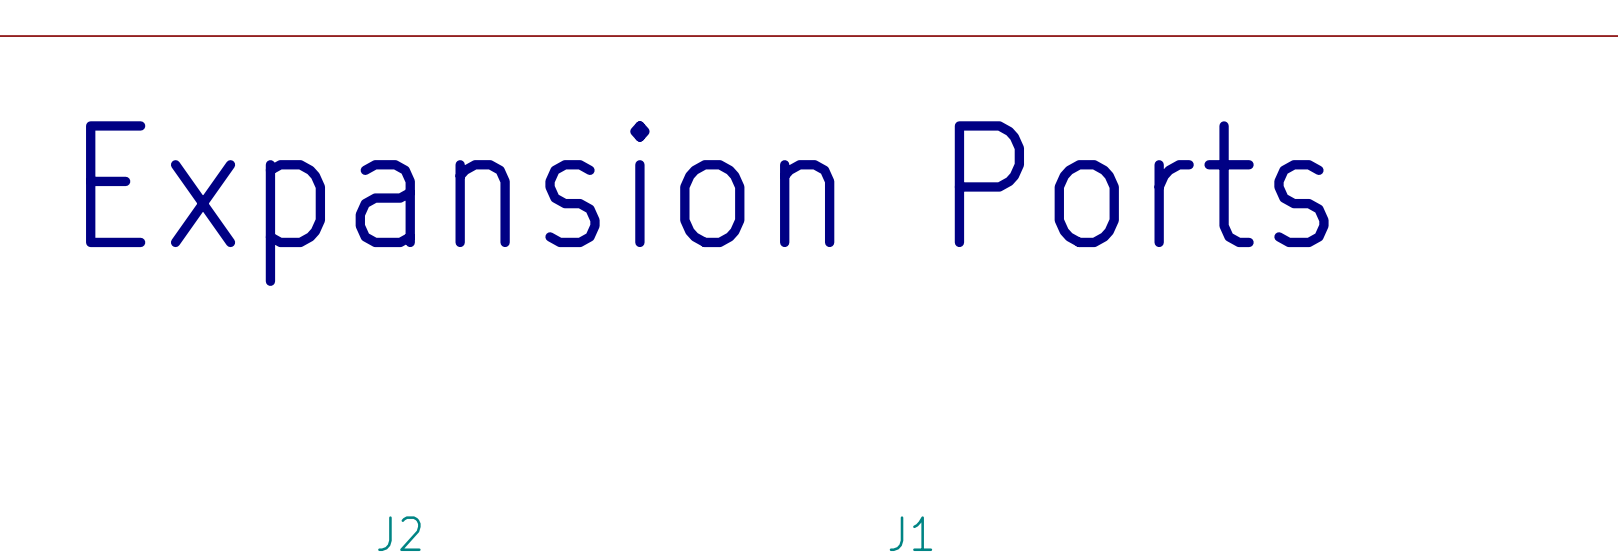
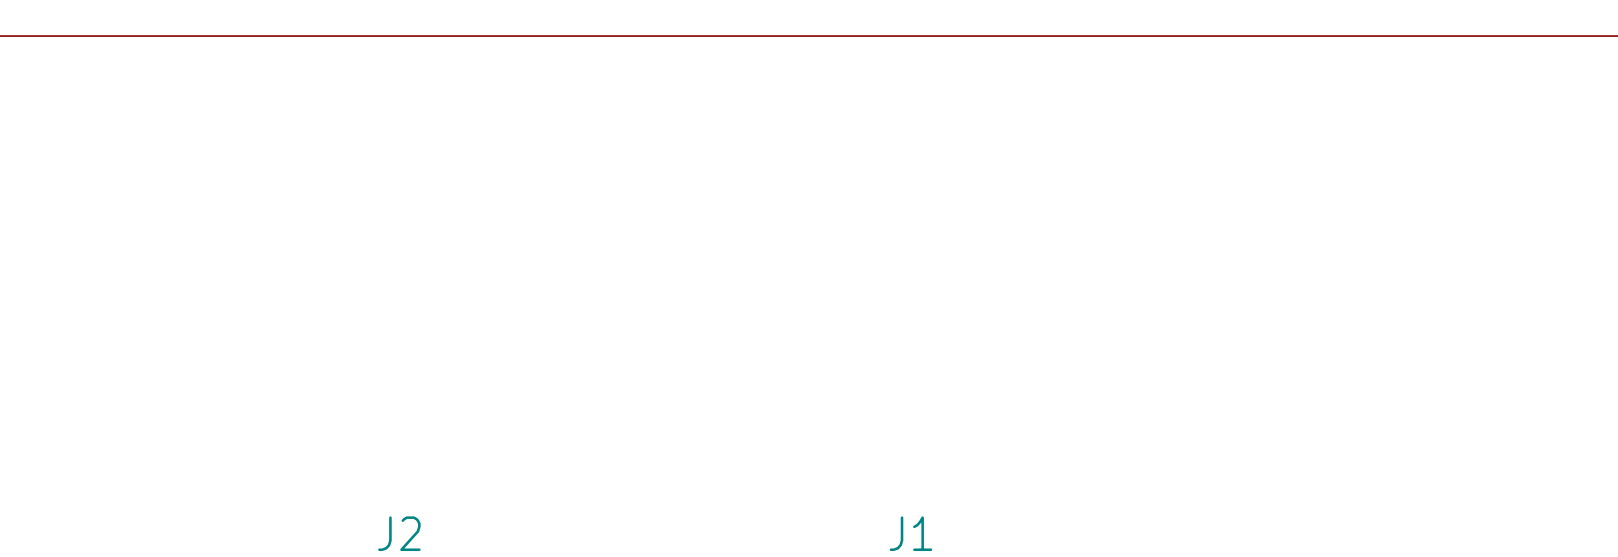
text: Expansion Ports (707, 203) -> none

